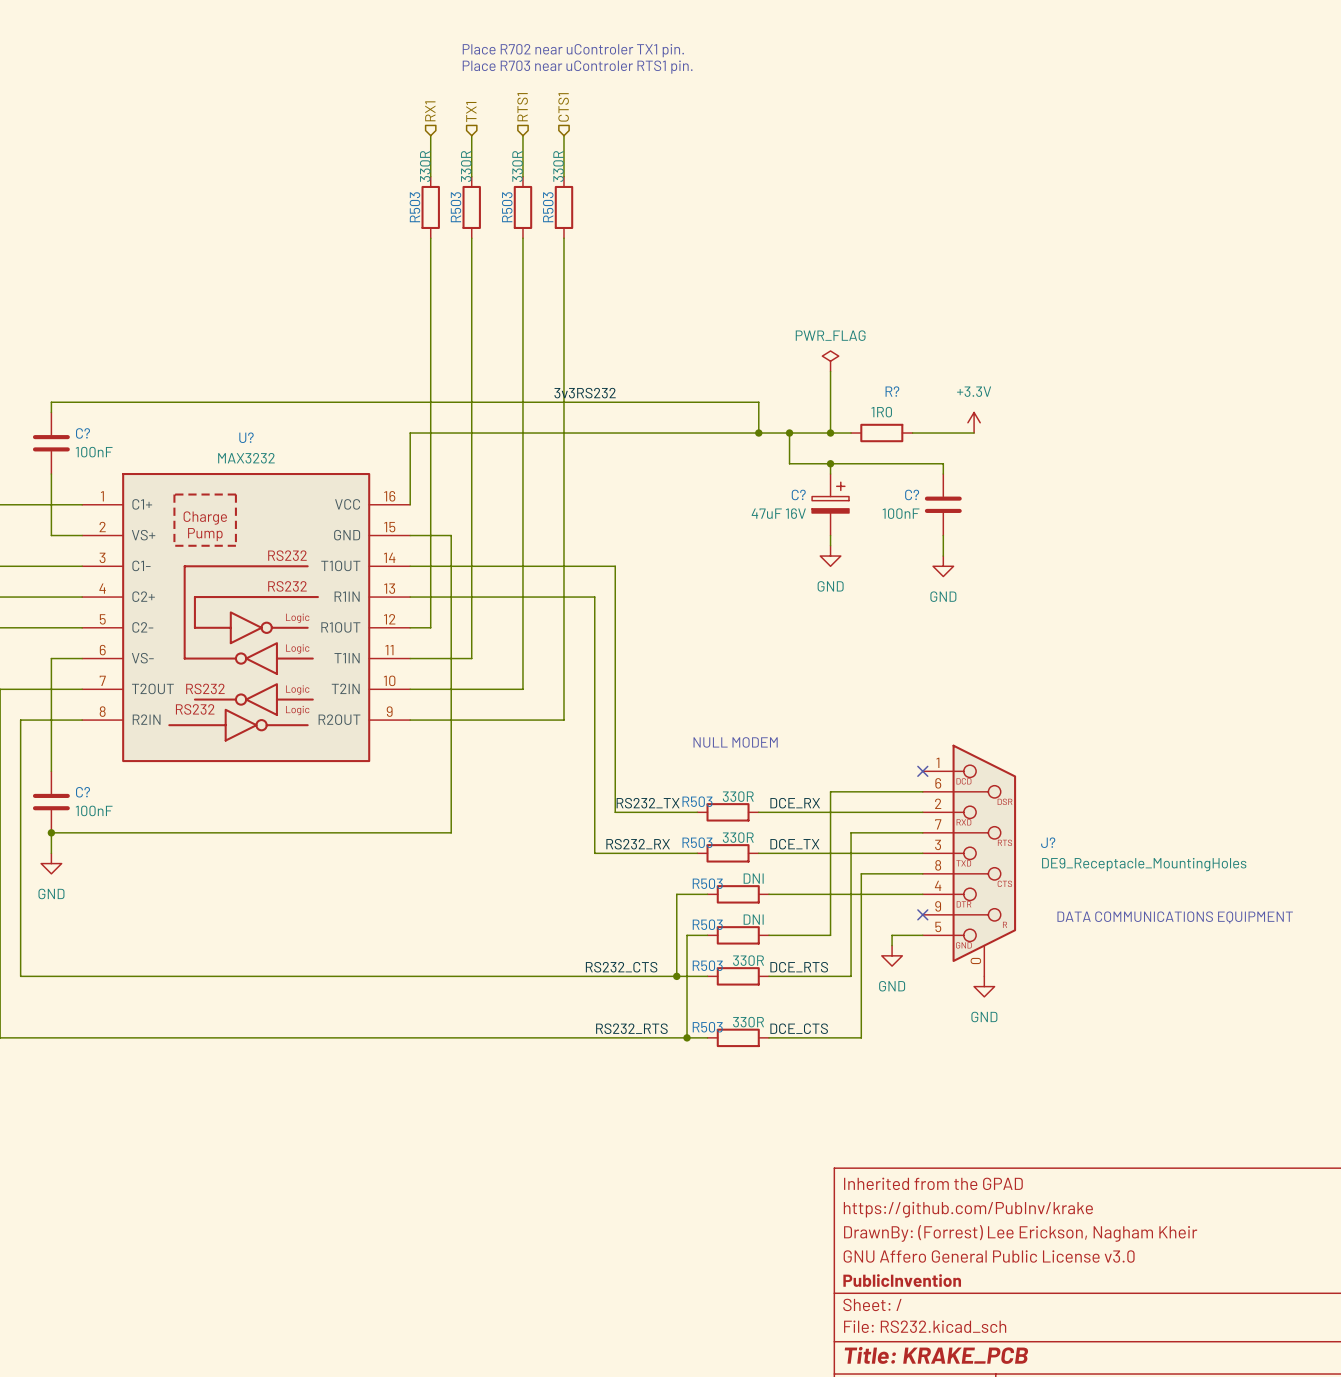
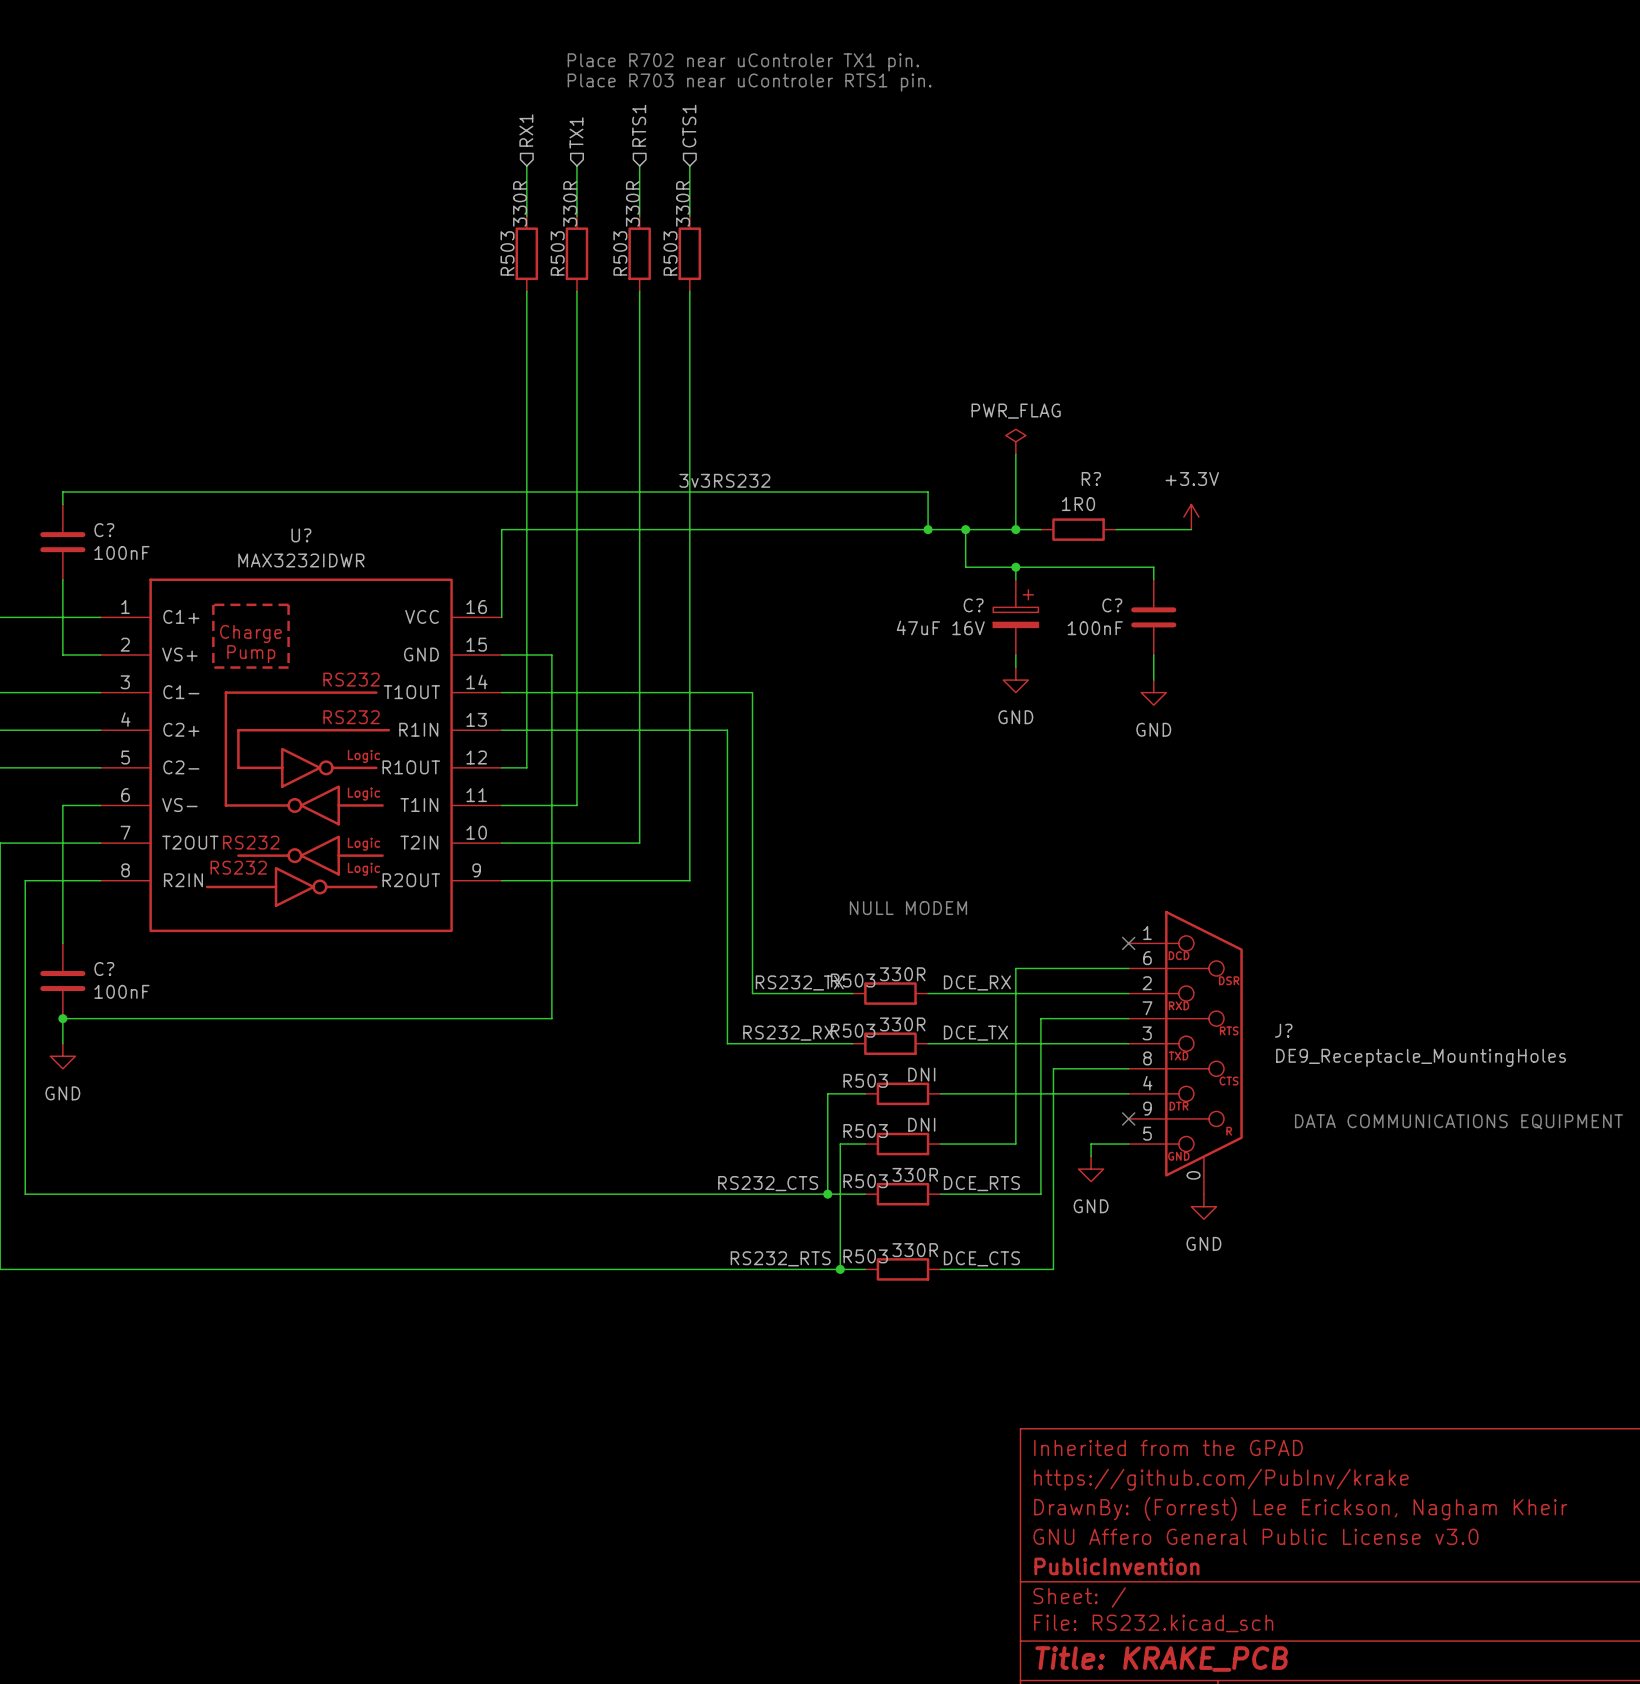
U? value: MAX3232 (246, 458) -> MAX3232IDWR (301, 560)

